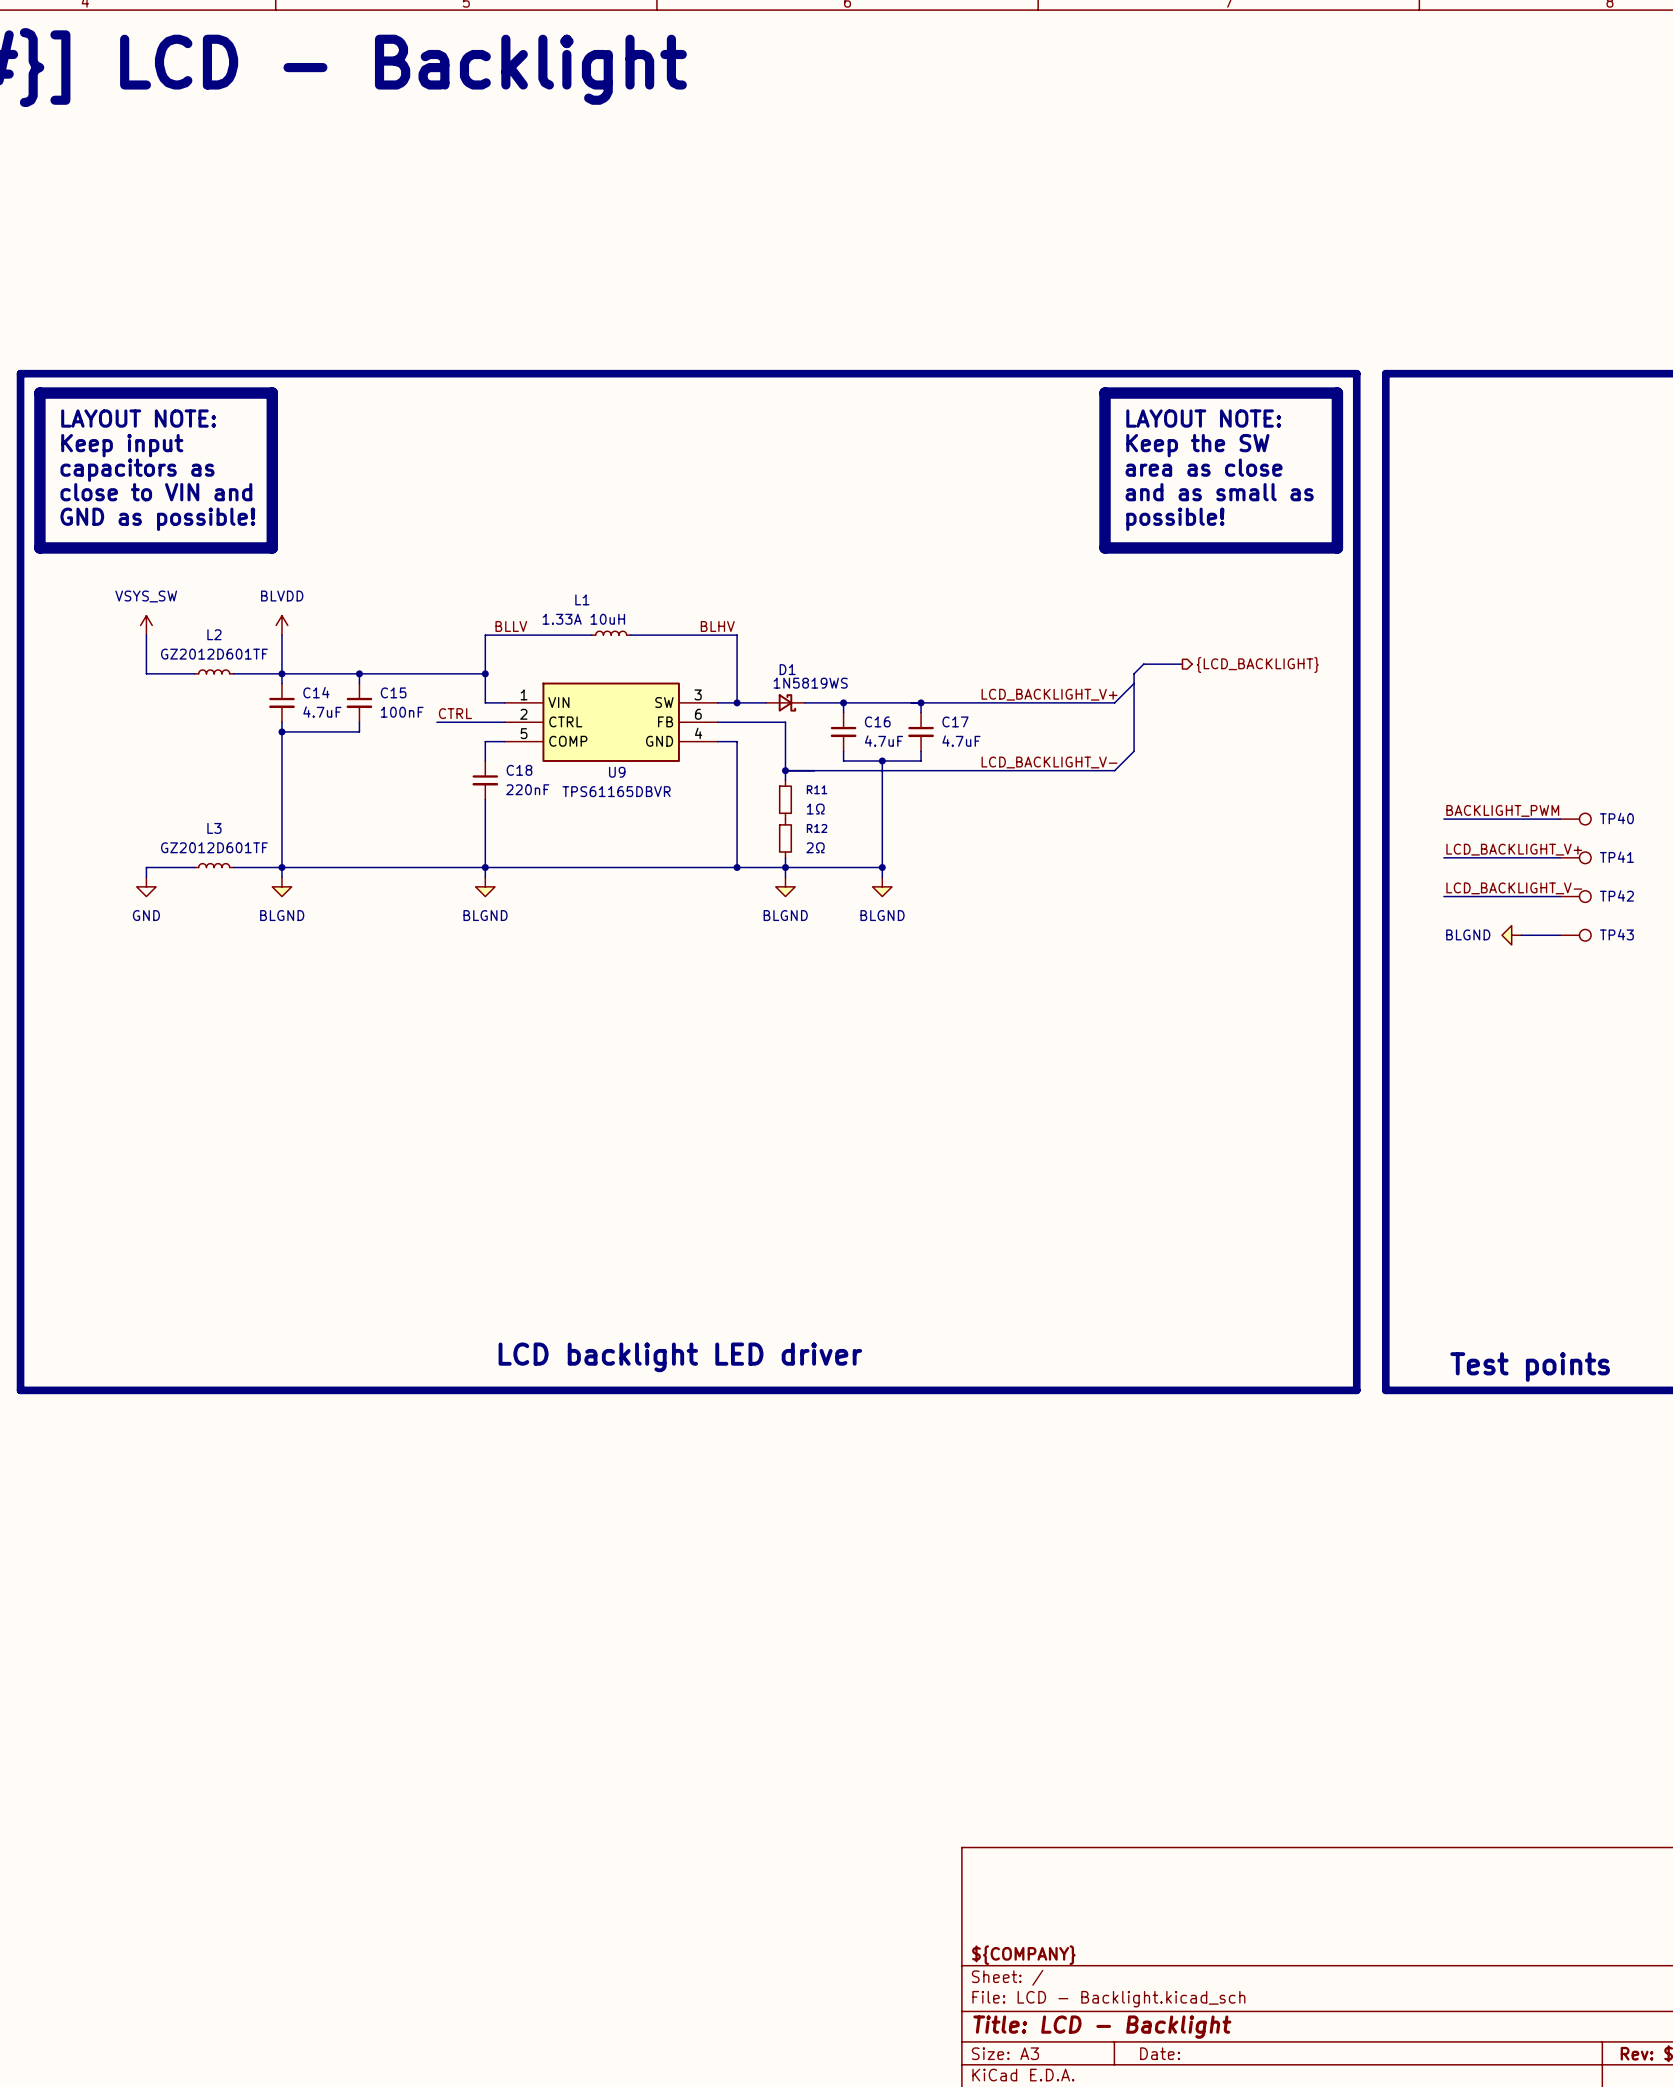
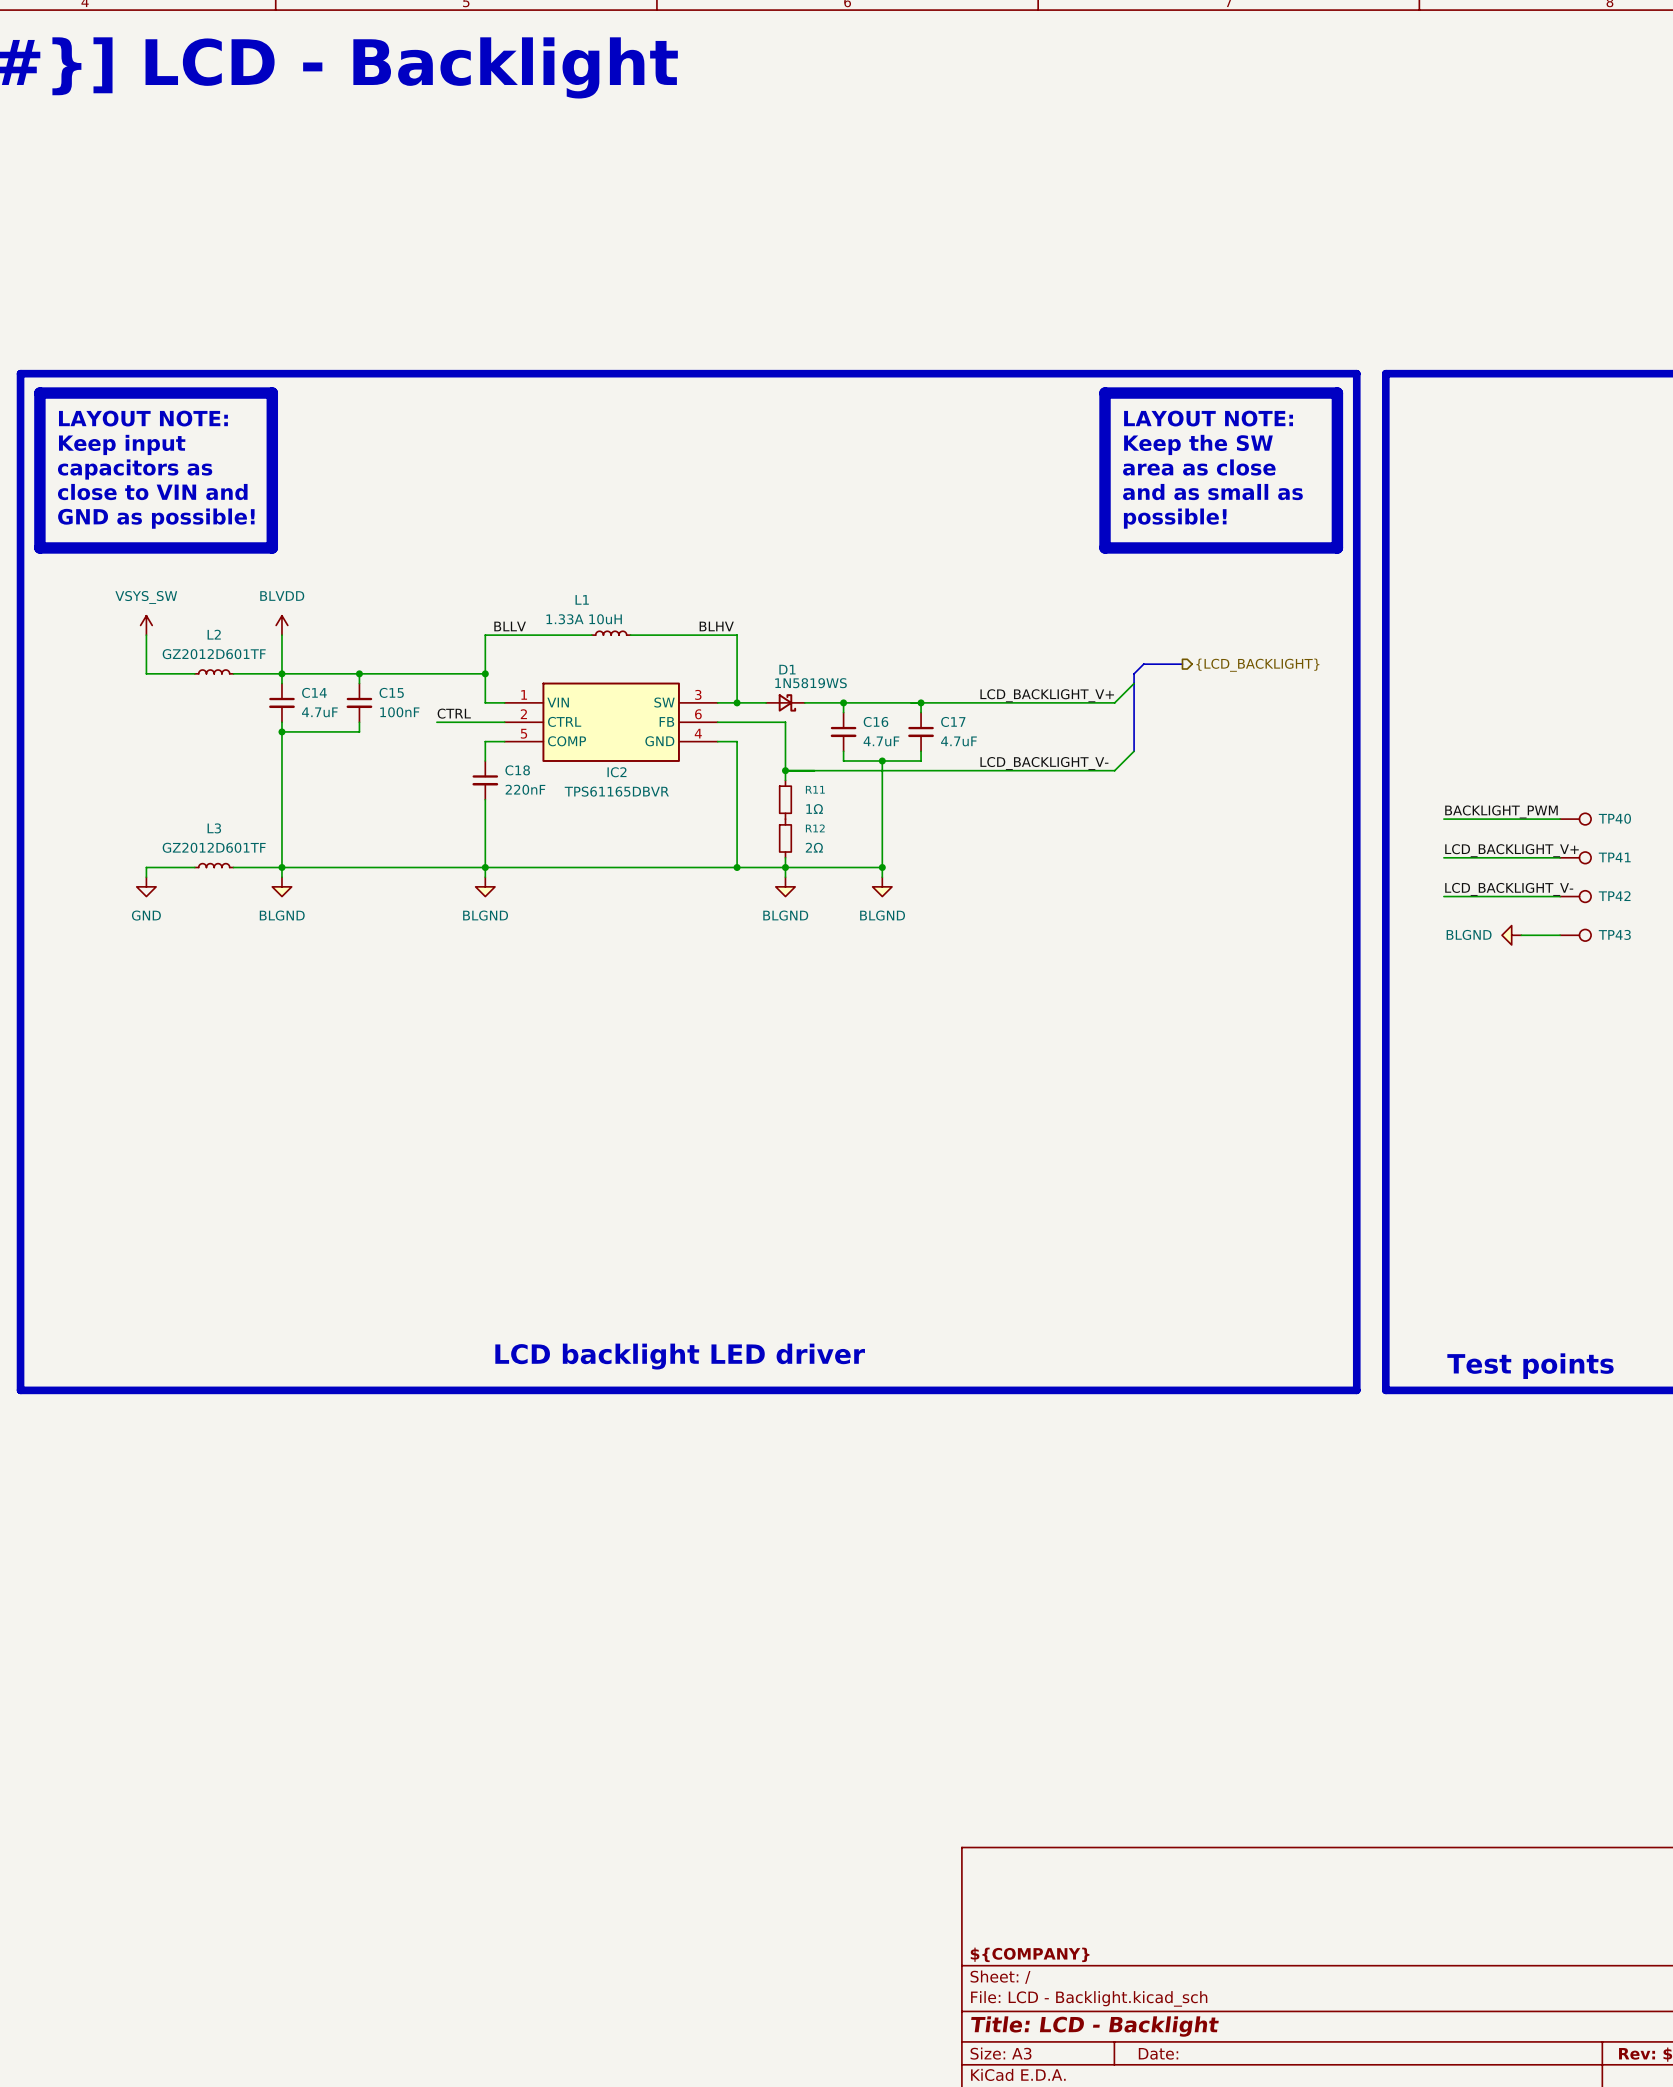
U9 name: U9 (617, 772) -> IC2 (616, 772)

